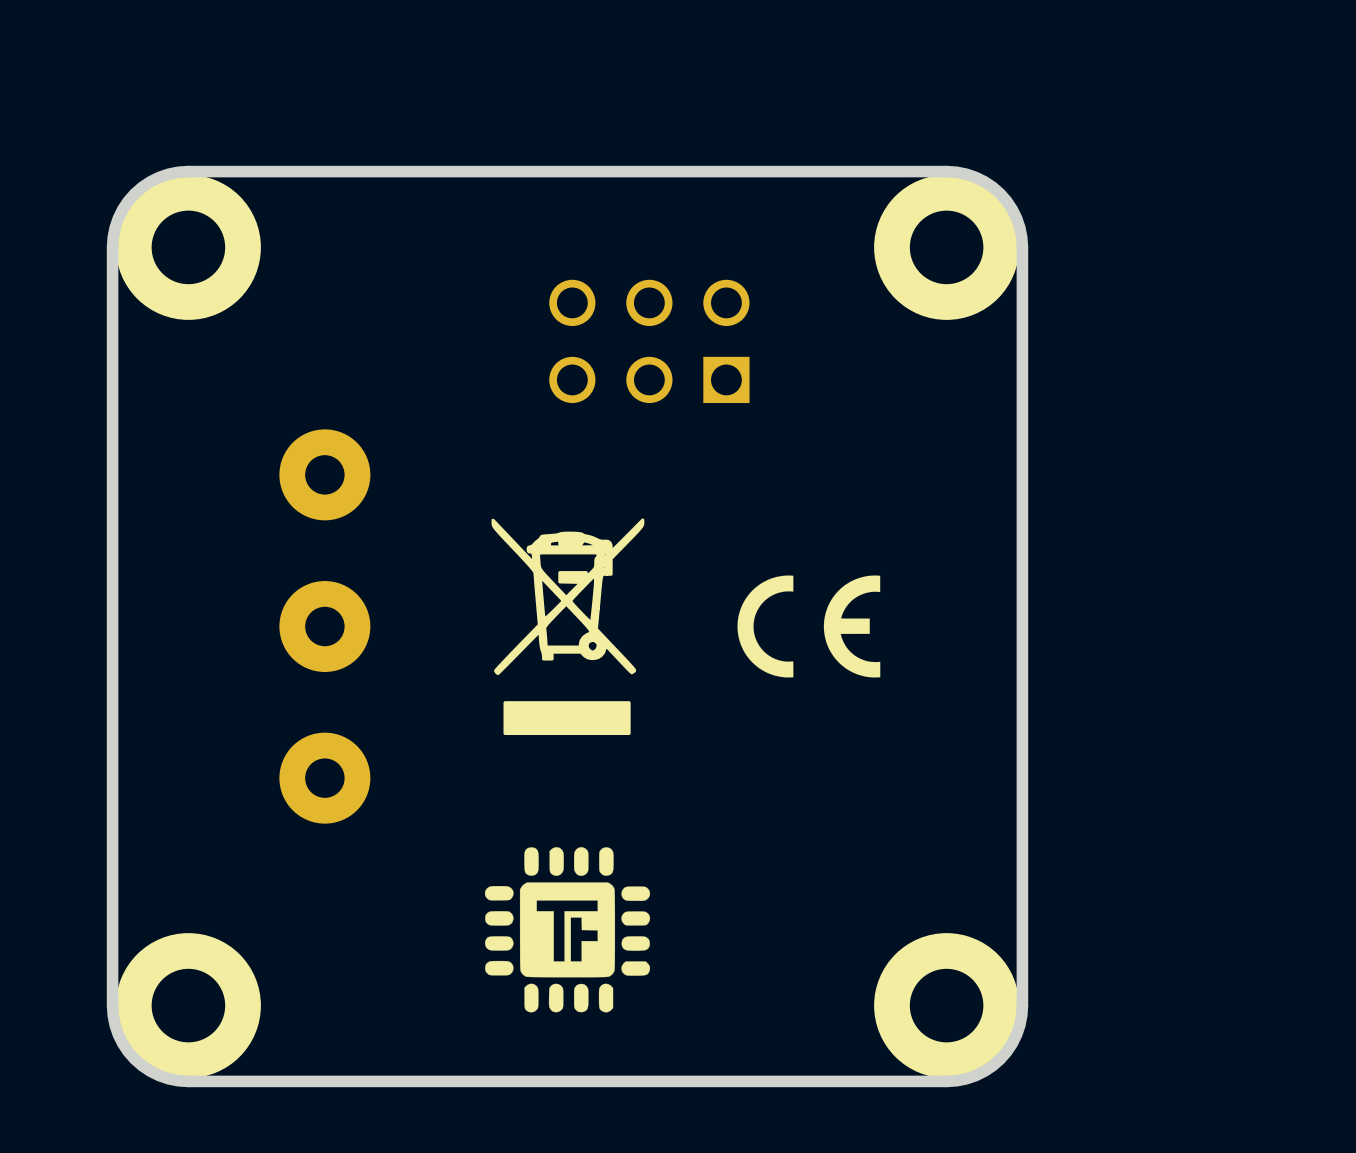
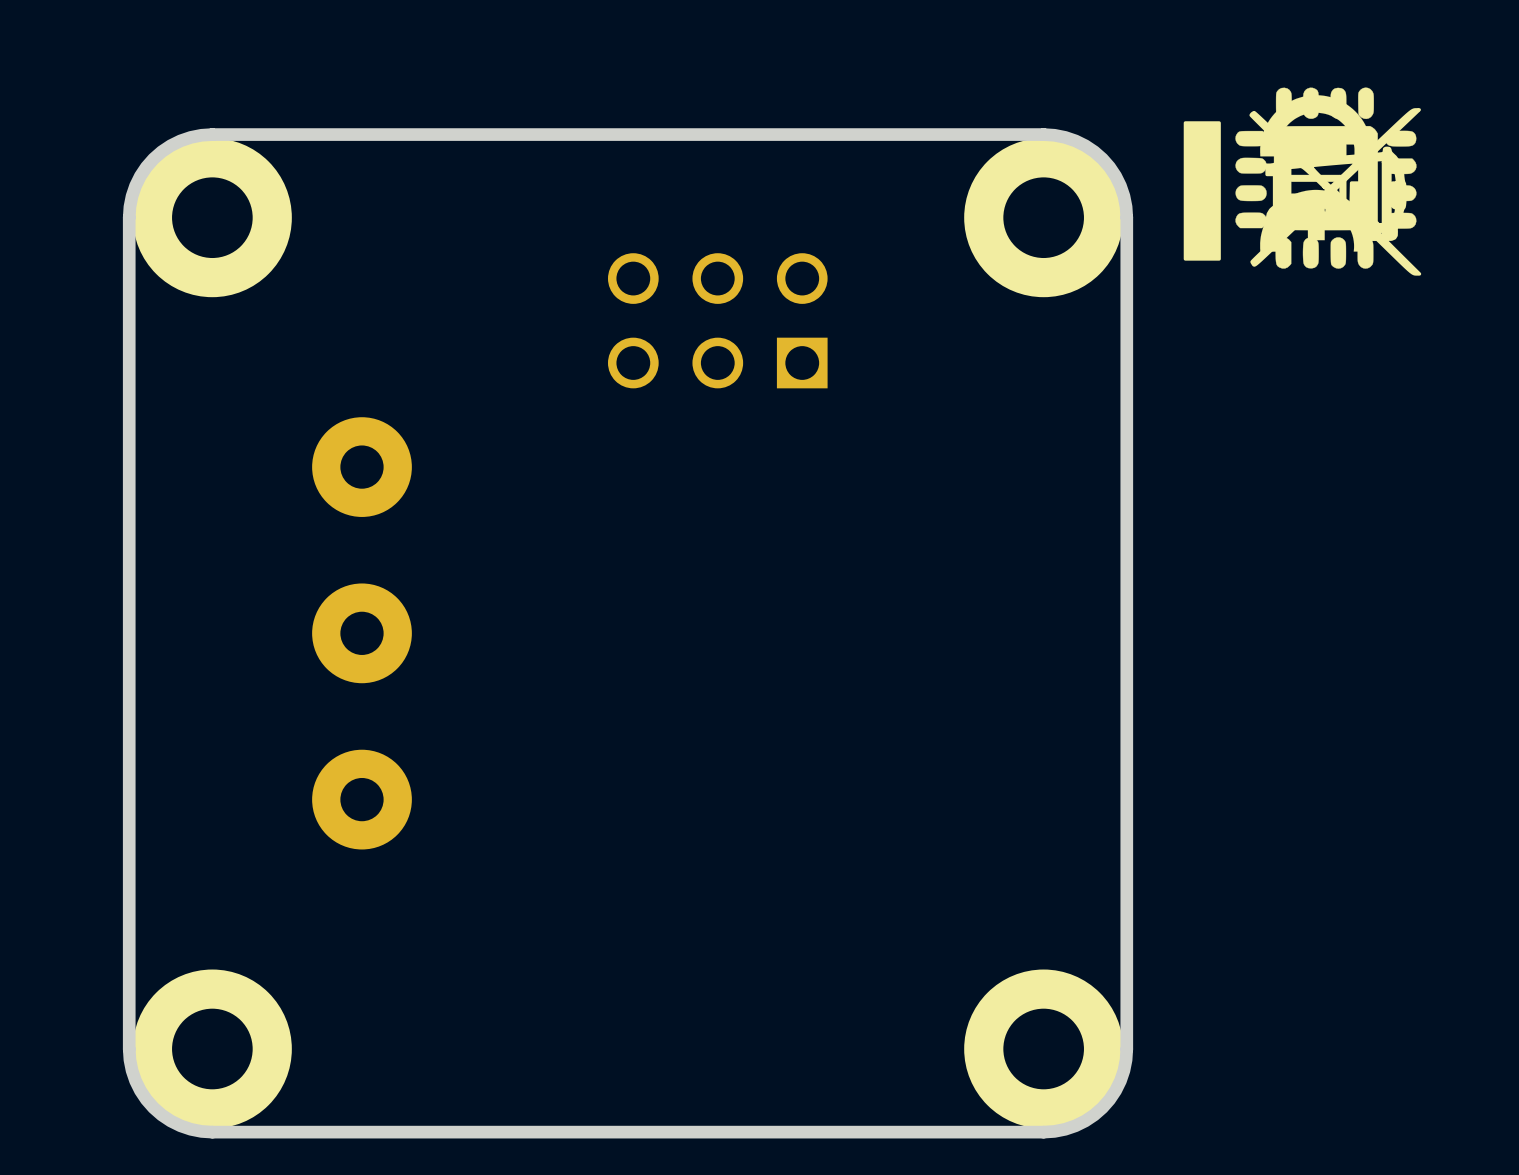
drawing: none -> [1183, 87, 1422, 276]
drawing: [491, 518, 645, 736] -> none
drawing: [737, 575, 881, 678] -> none
drawing: [484, 847, 651, 1013] -> none

